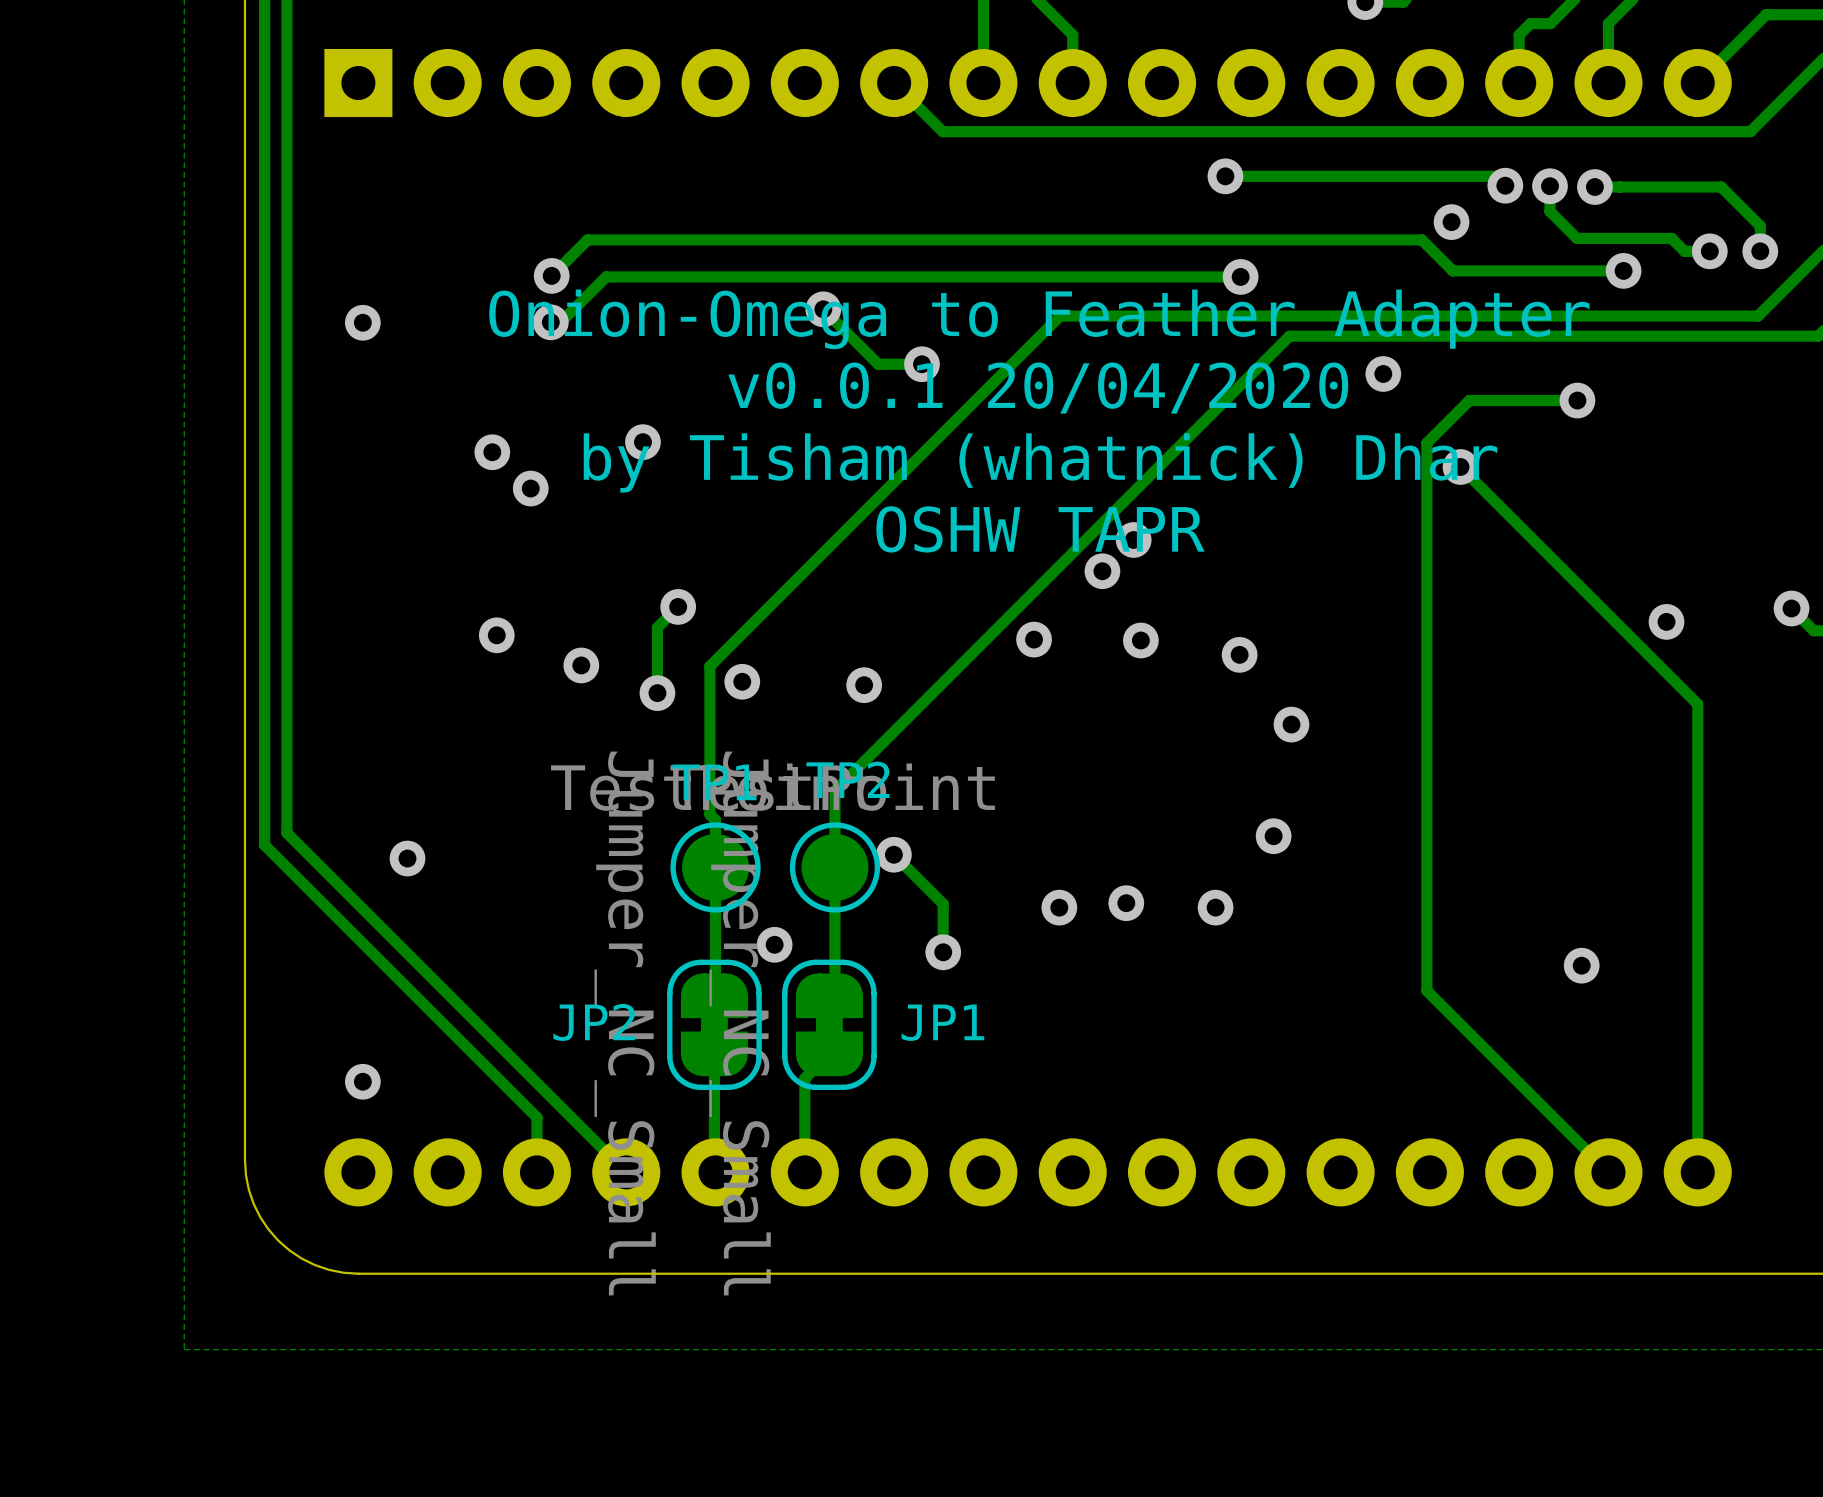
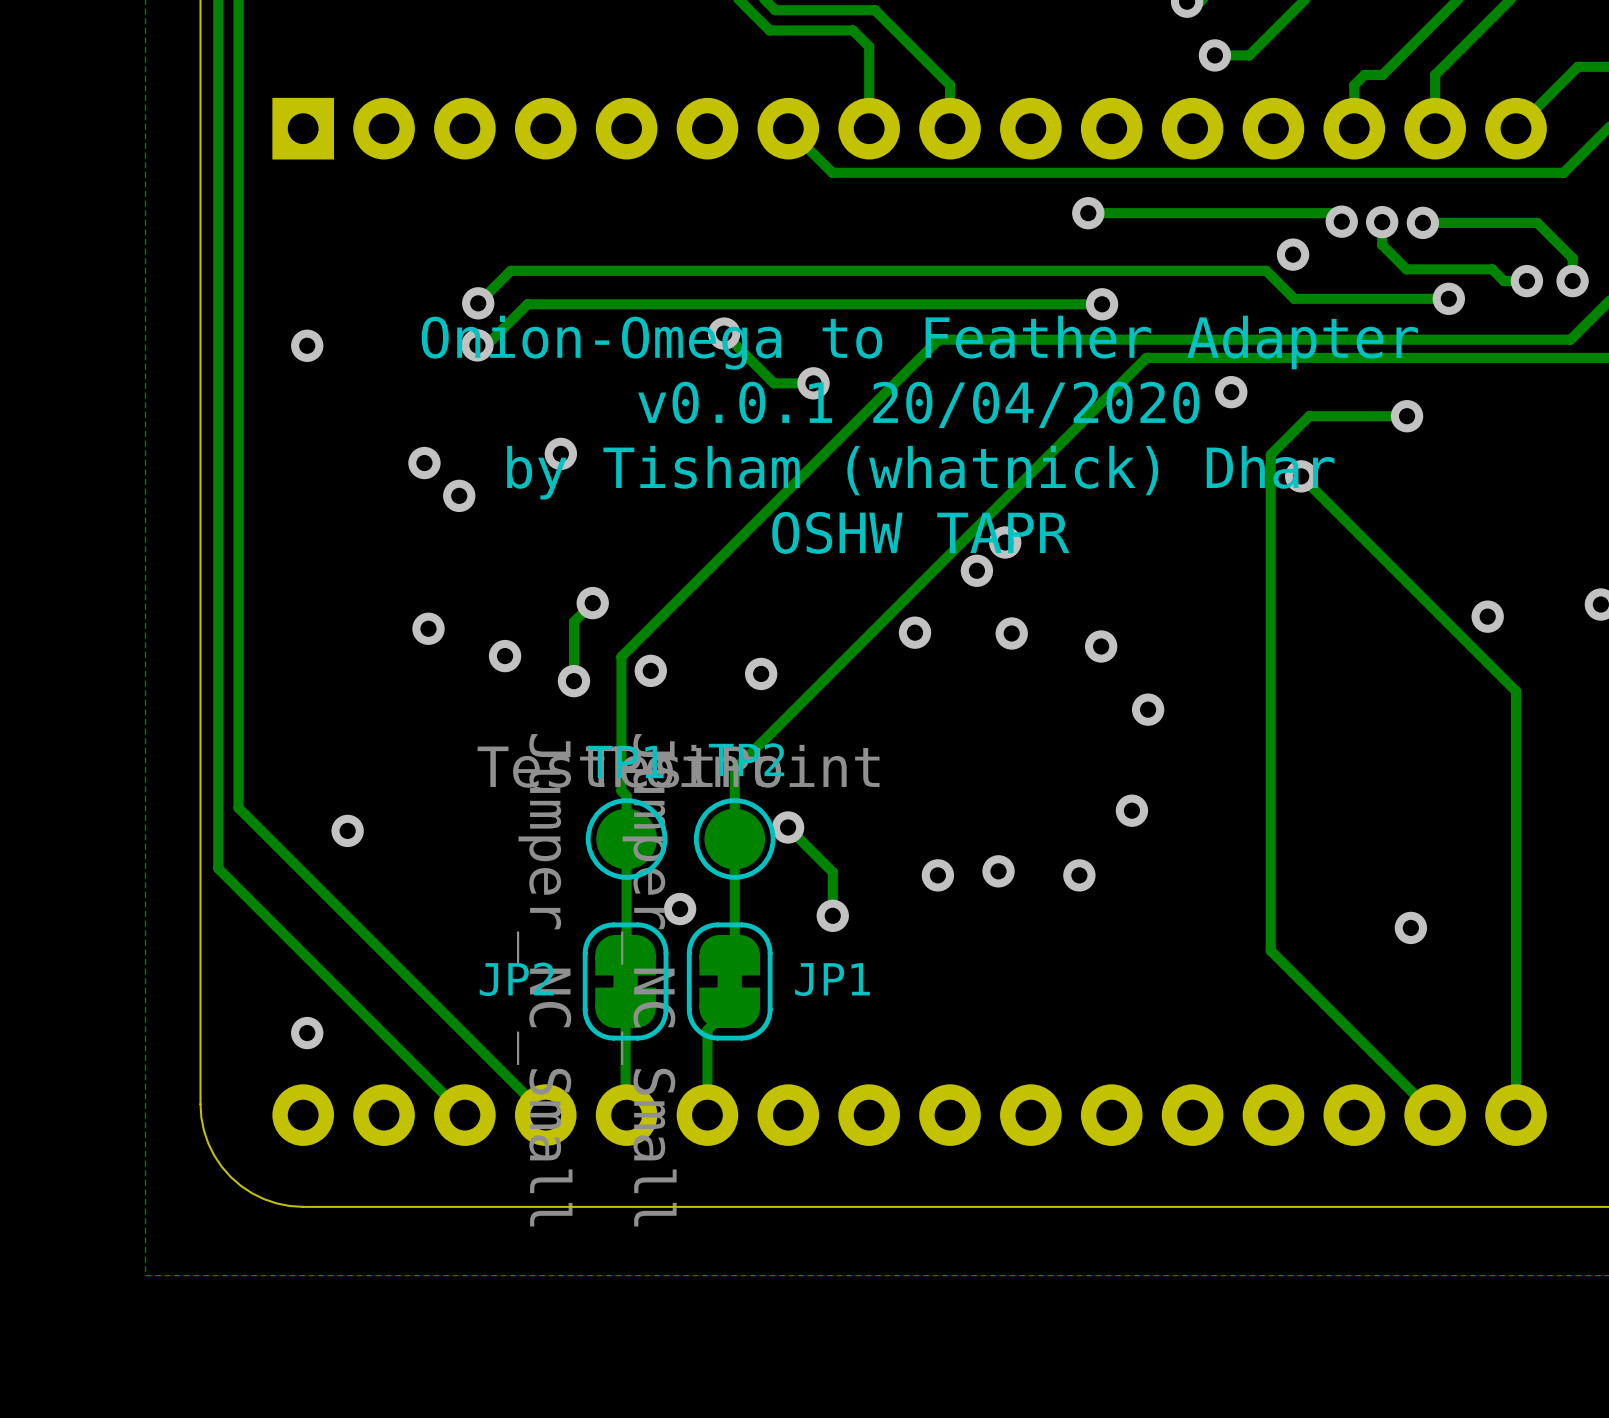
track: (264, 845) (536, 1117) (536, 1172) -> (218, 818) (218, 868) (464, 1115)

